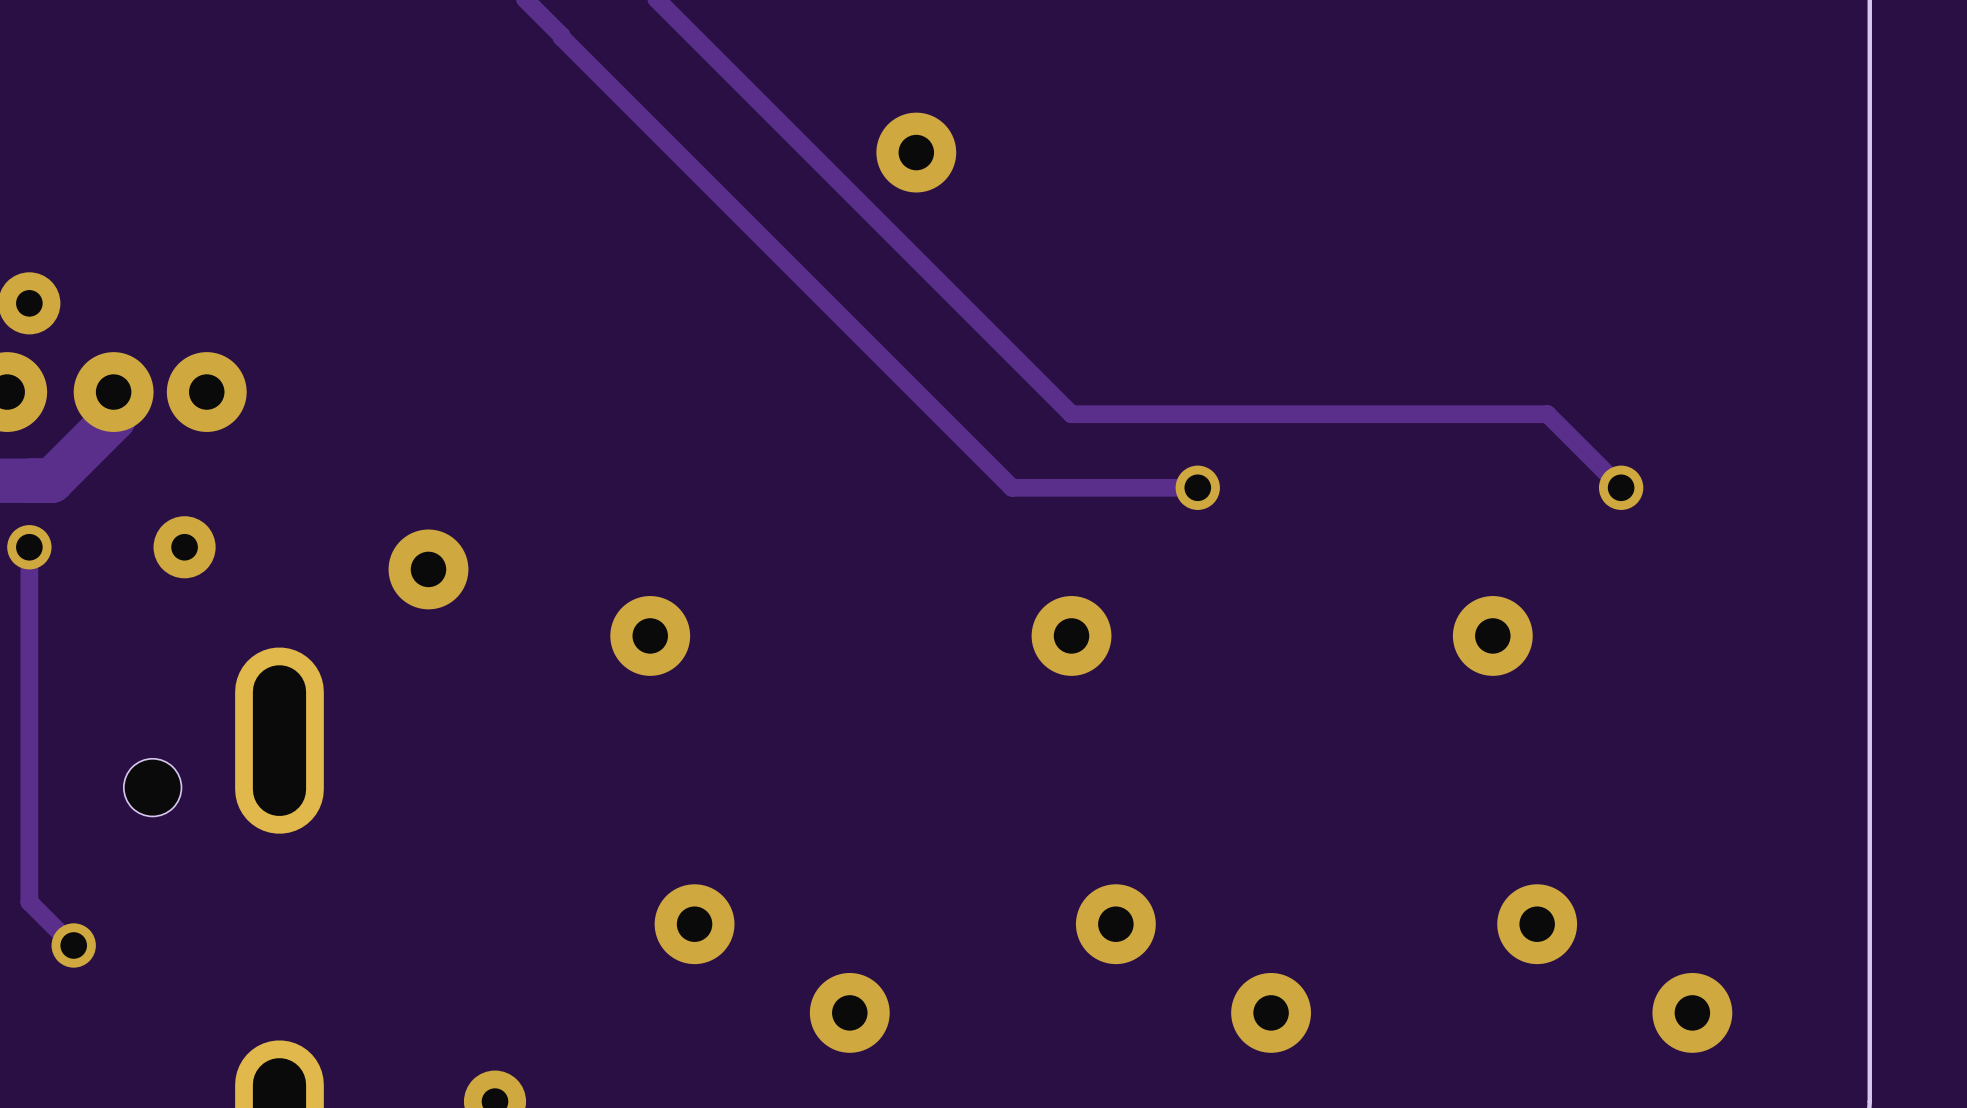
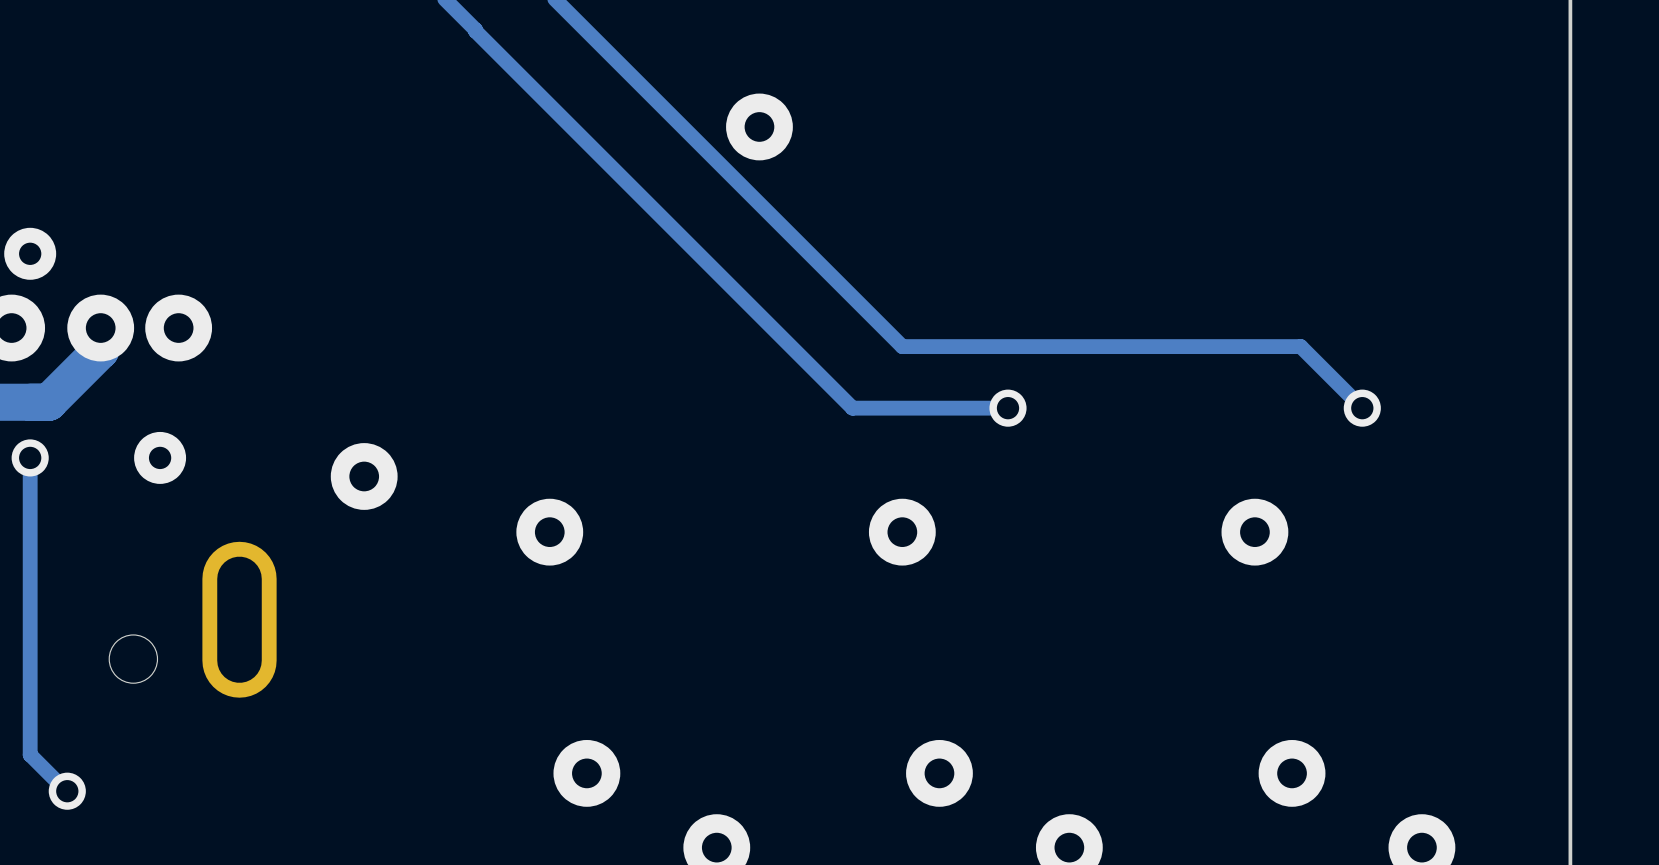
via position: (916, 152) -> (759, 126)

